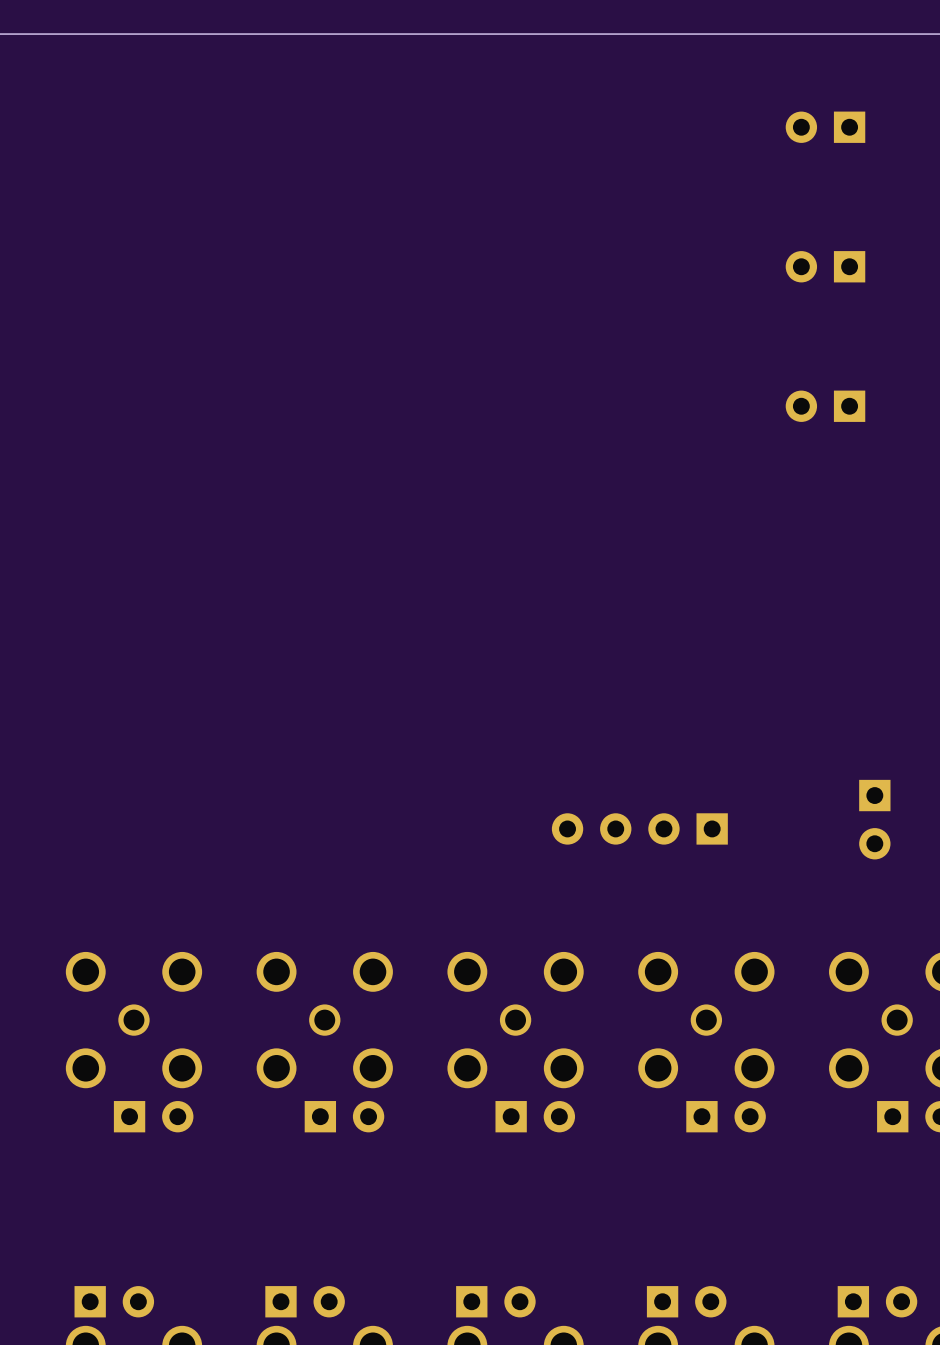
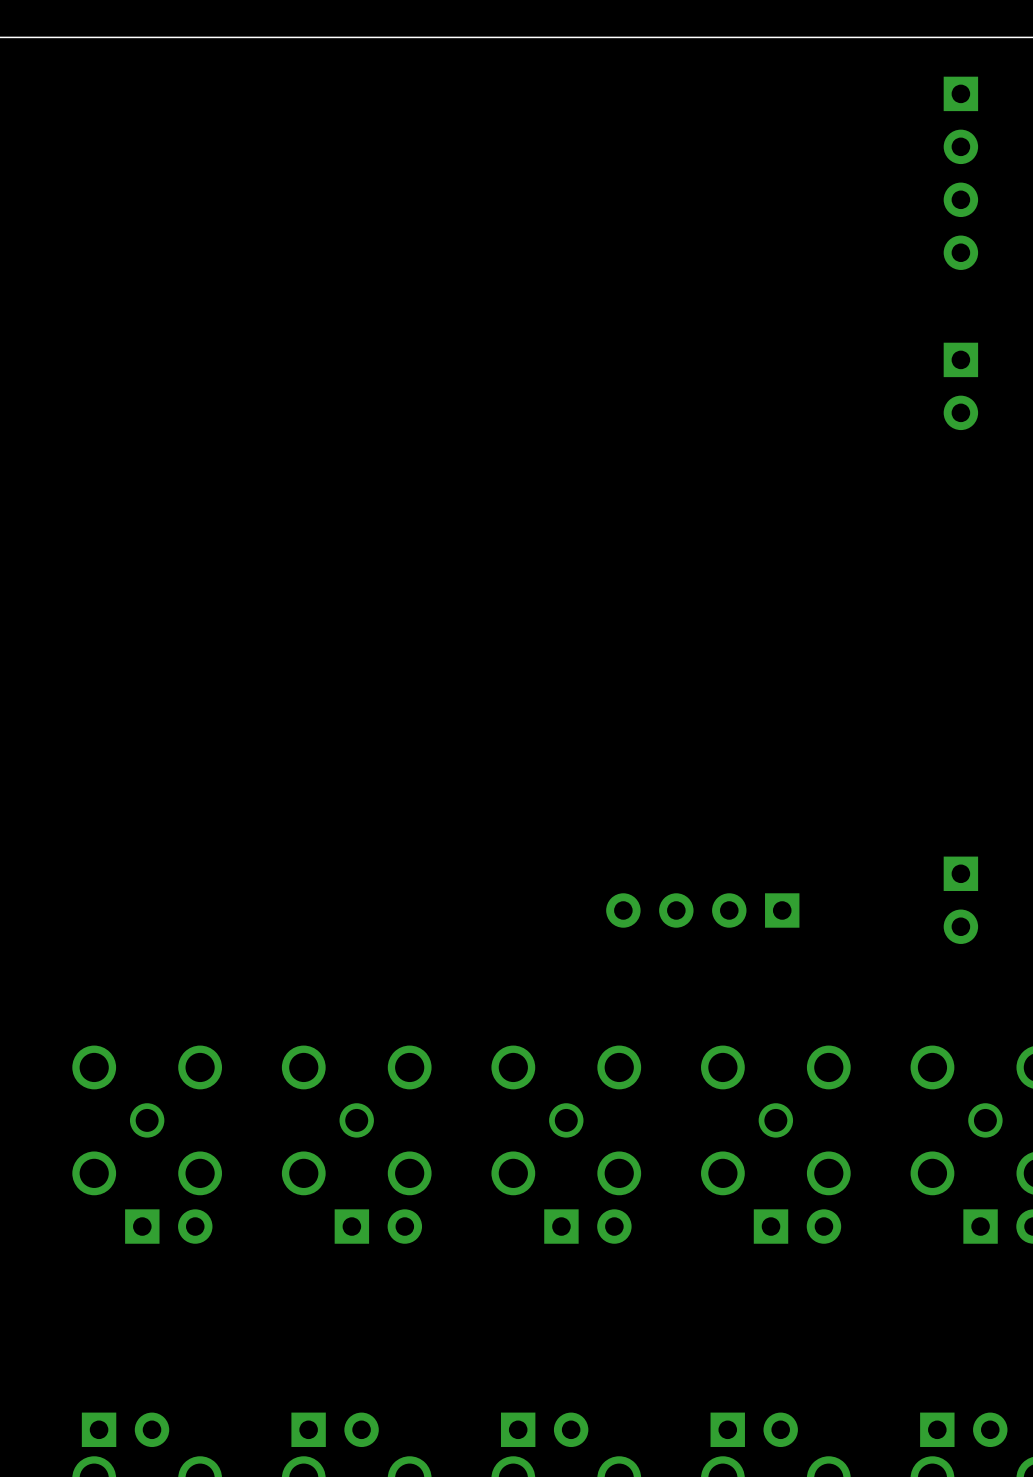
part: (825, 127) -> none
part: none -> (960, 173)
part: (825, 266) -> none
part: none -> (960, 386)
part: (825, 406) -> none

